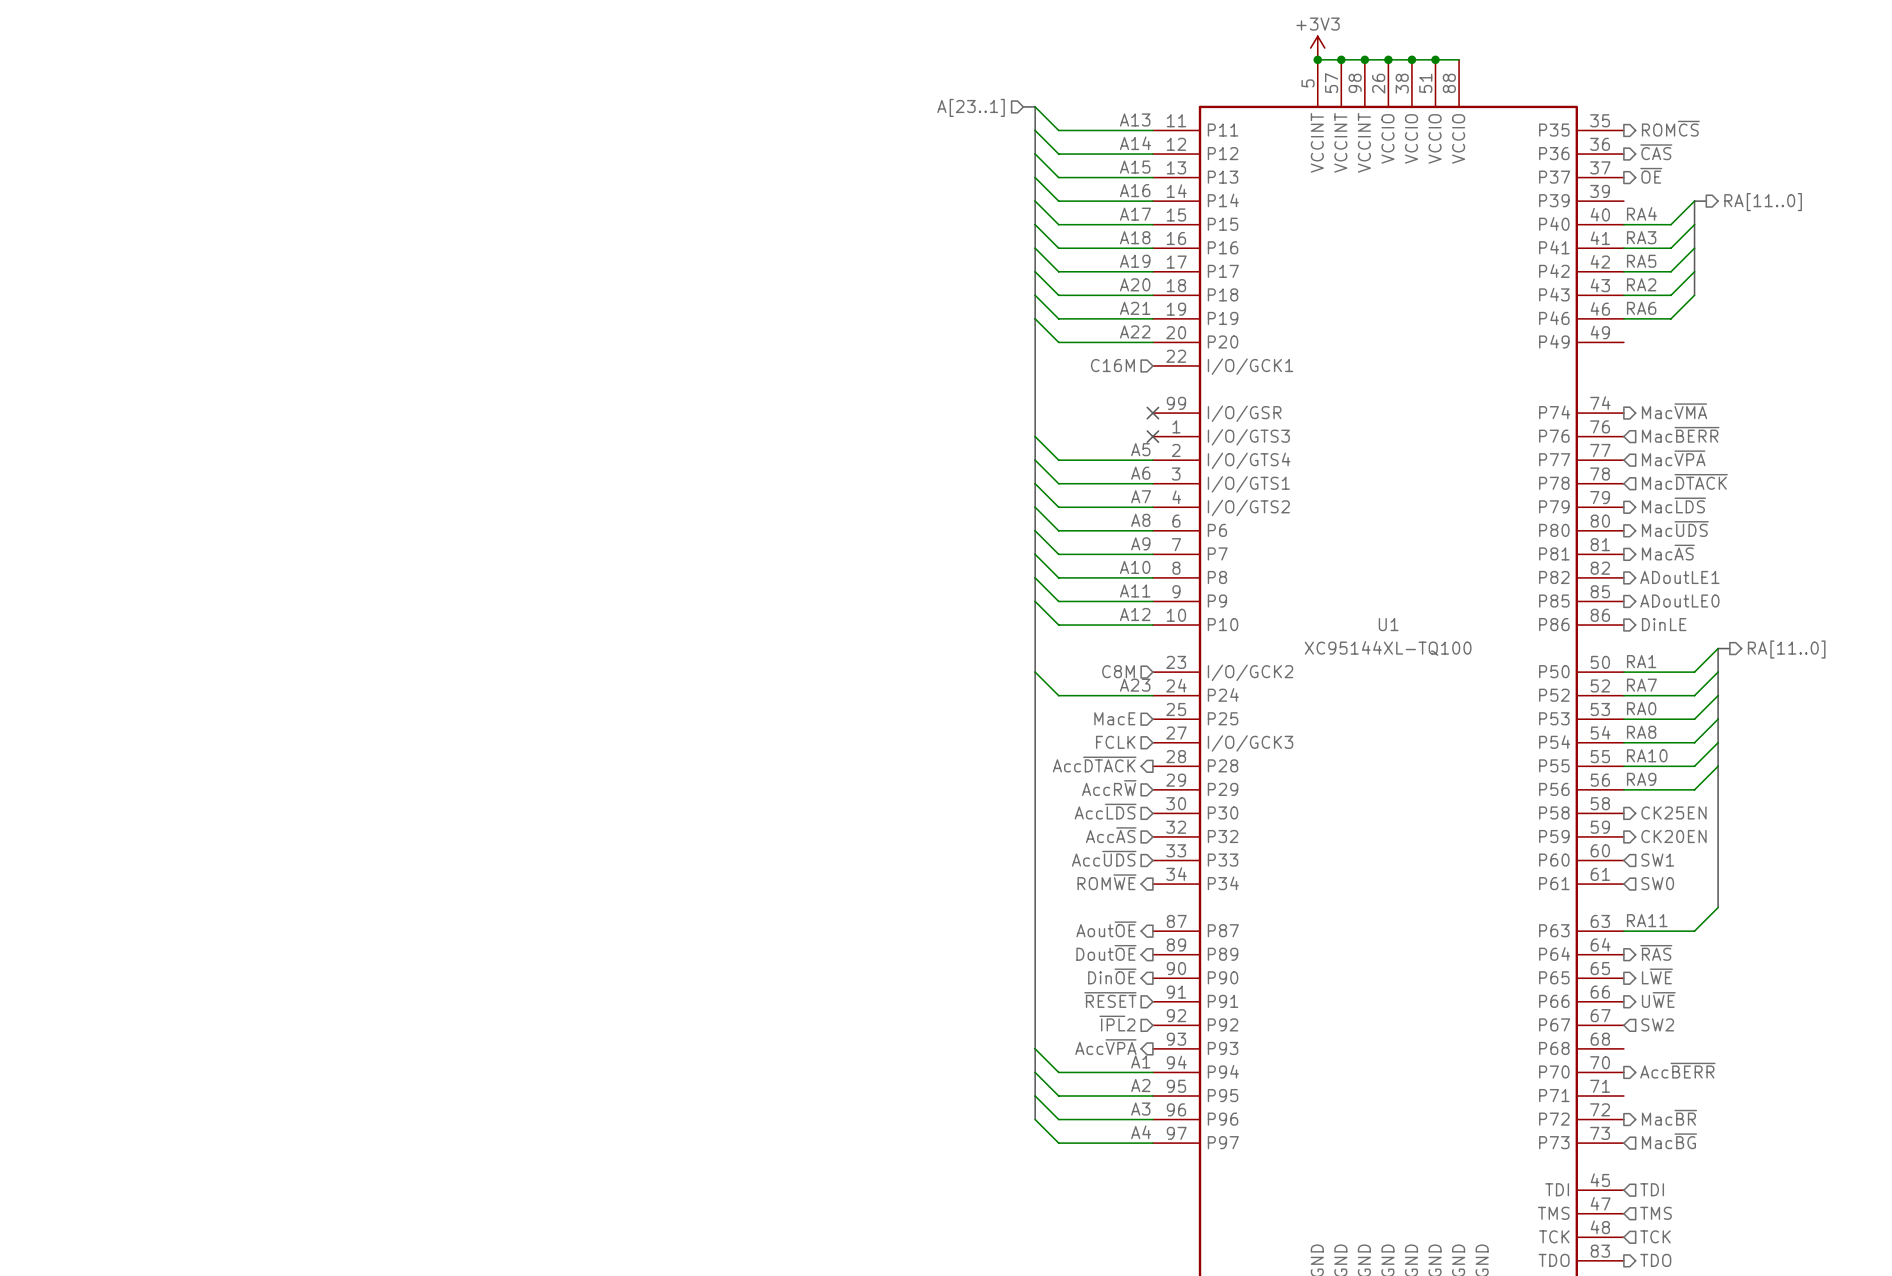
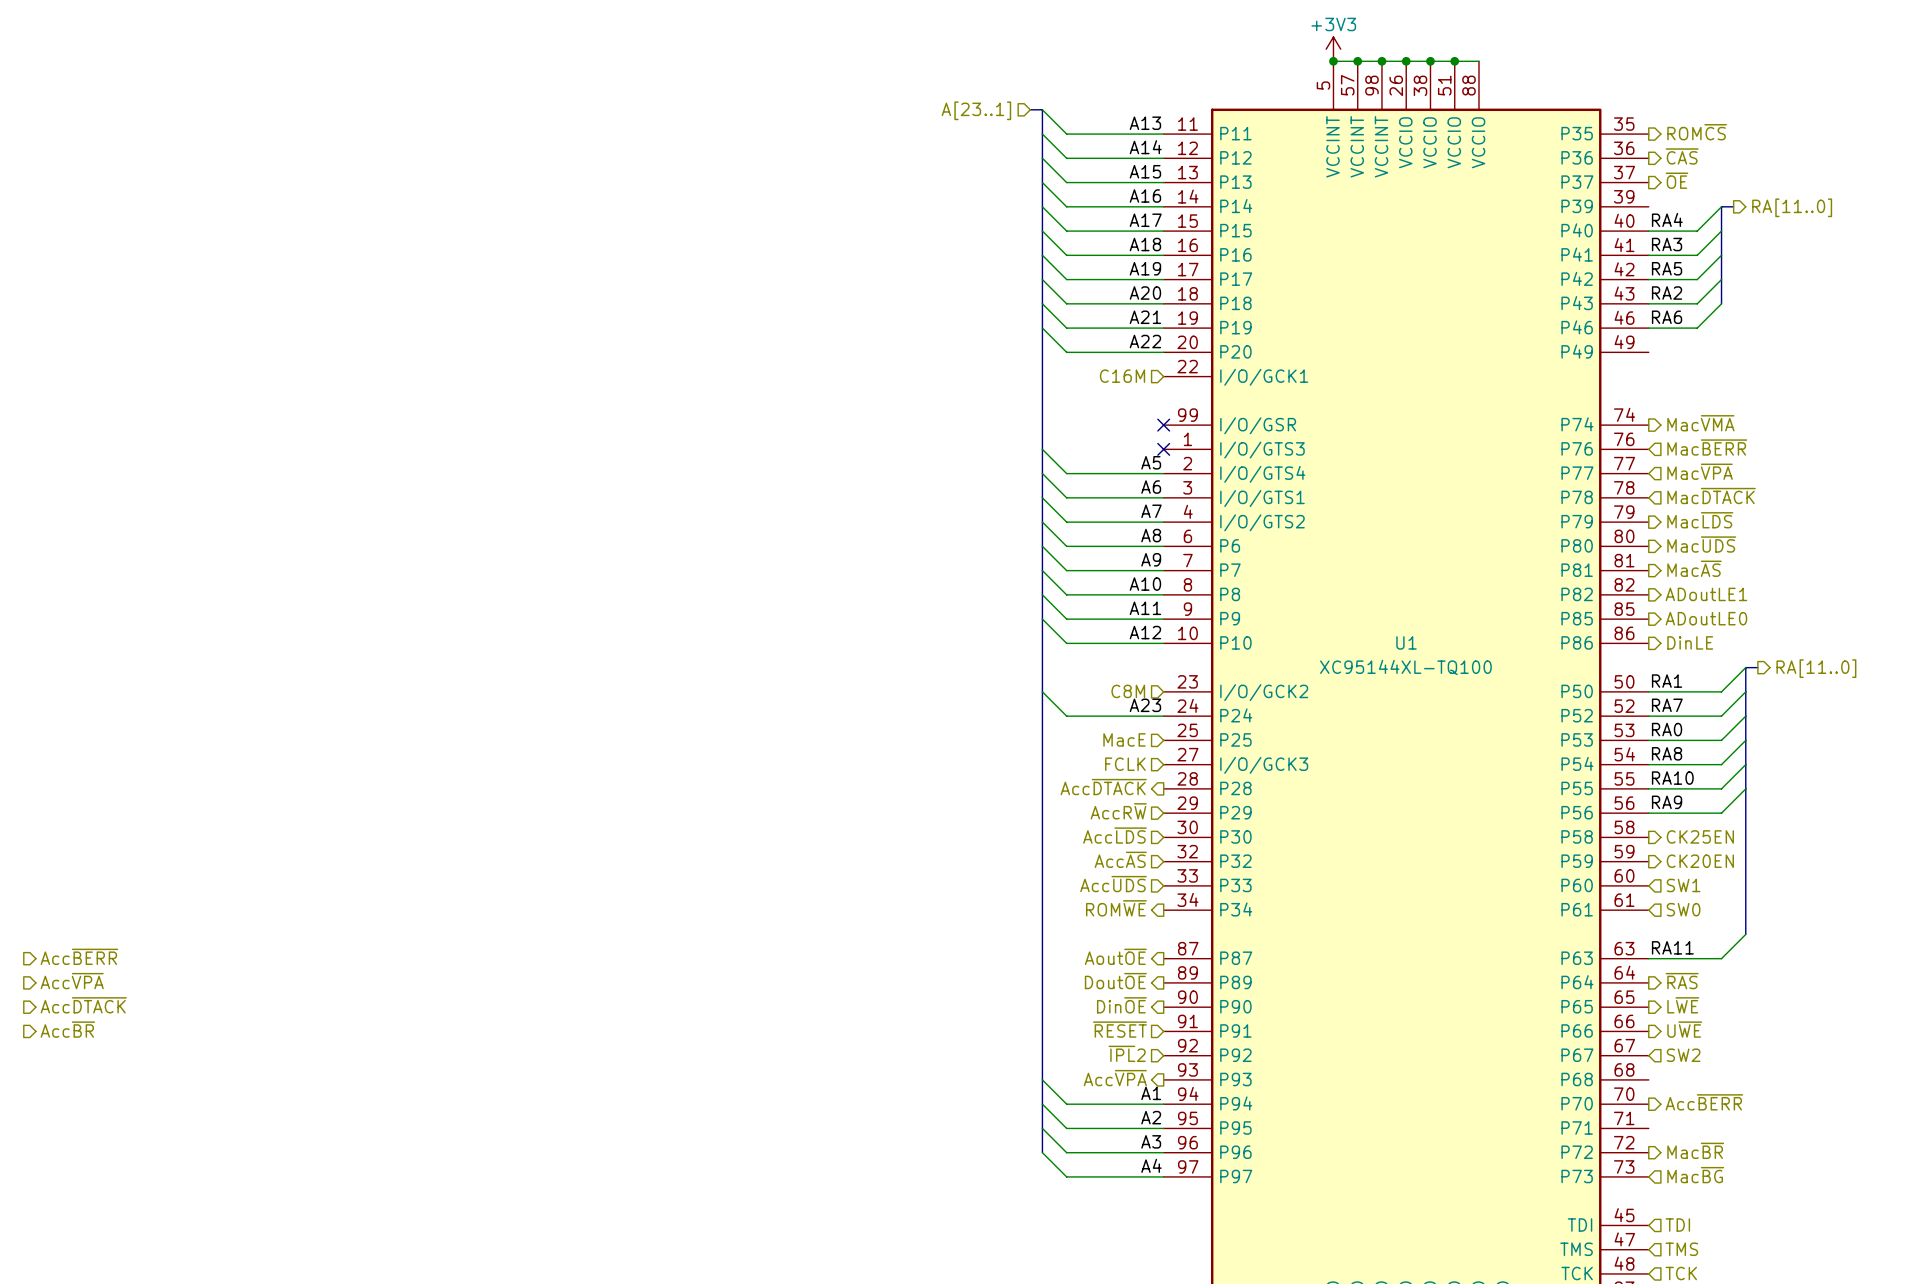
hierarchical label: none -> Acc~{BERR} (79, 956)
hierarchical label: none -> Acc~{VPA} (72, 981)
hierarchical label: none -> Acc~{DTACK} (83, 1005)
hierarchical label: none -> Acc~{BR} (67, 1029)

